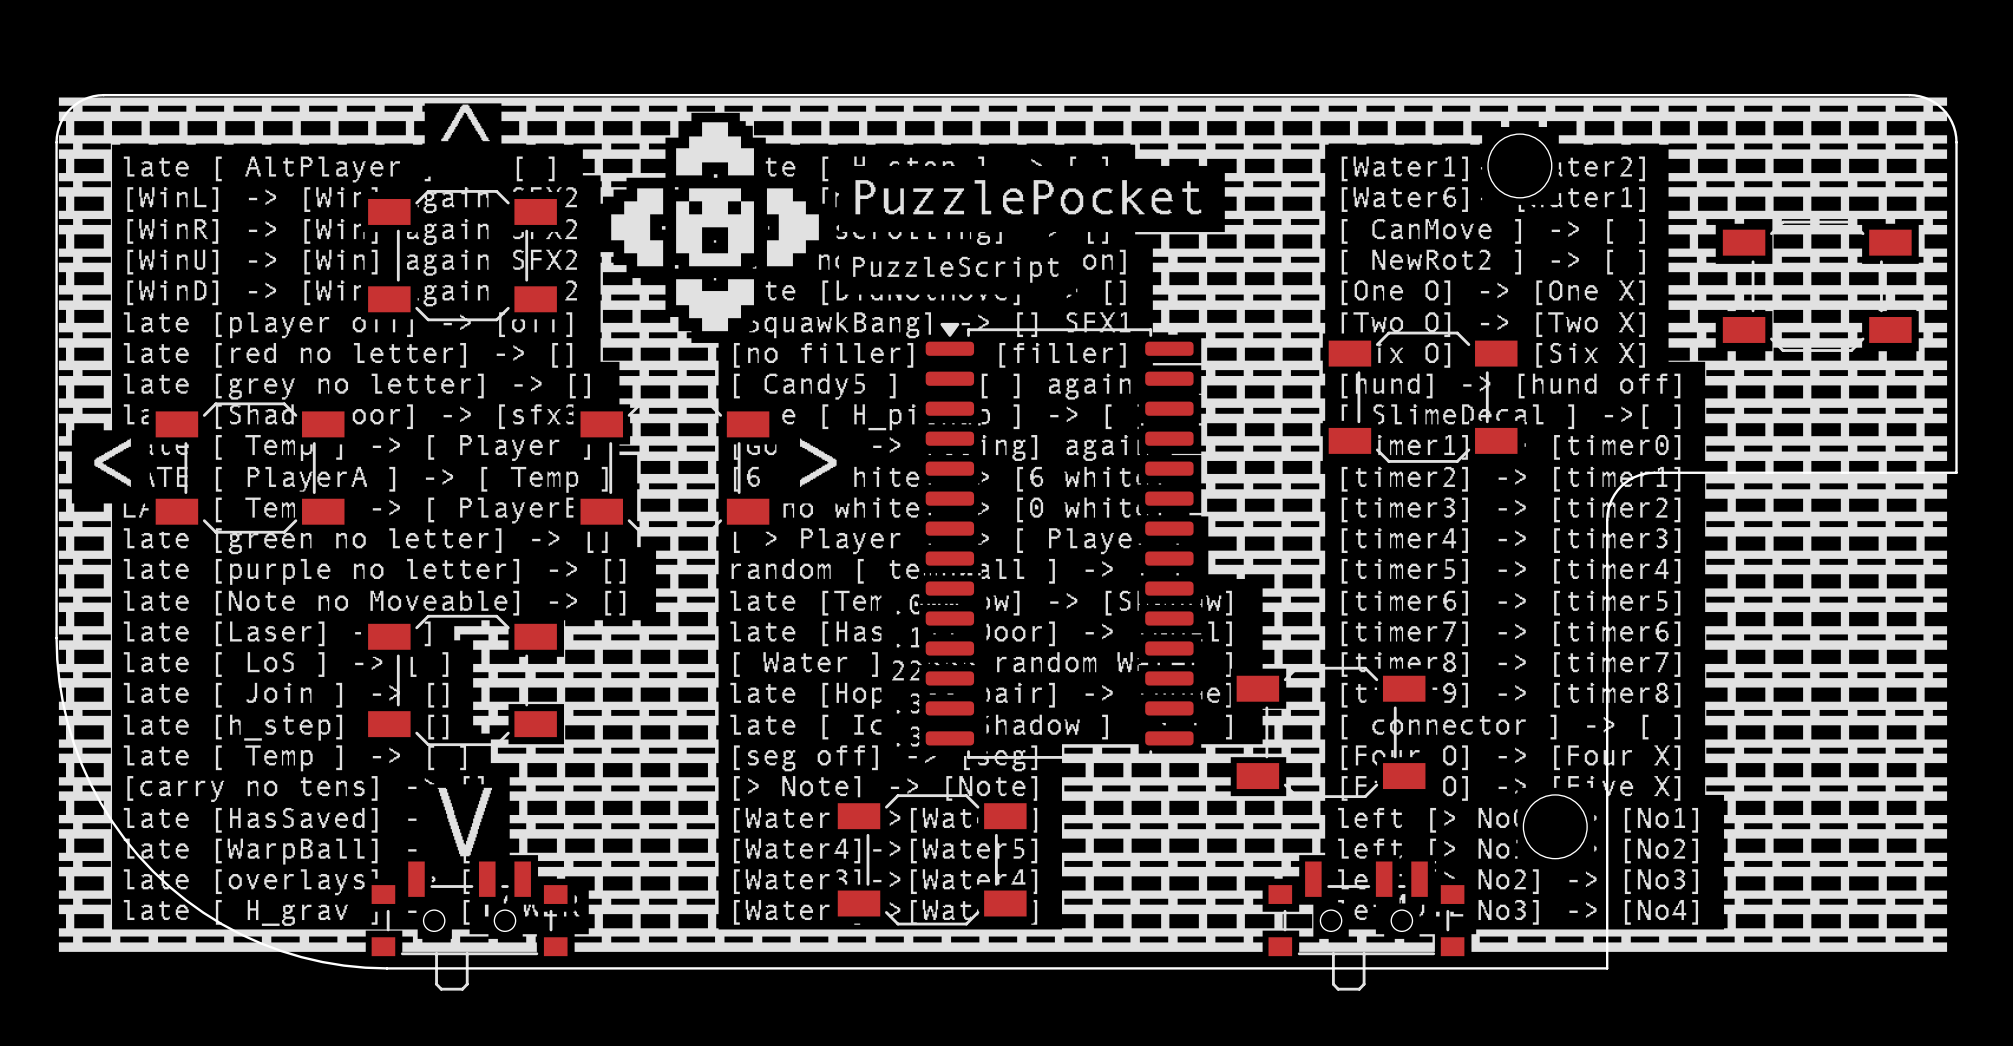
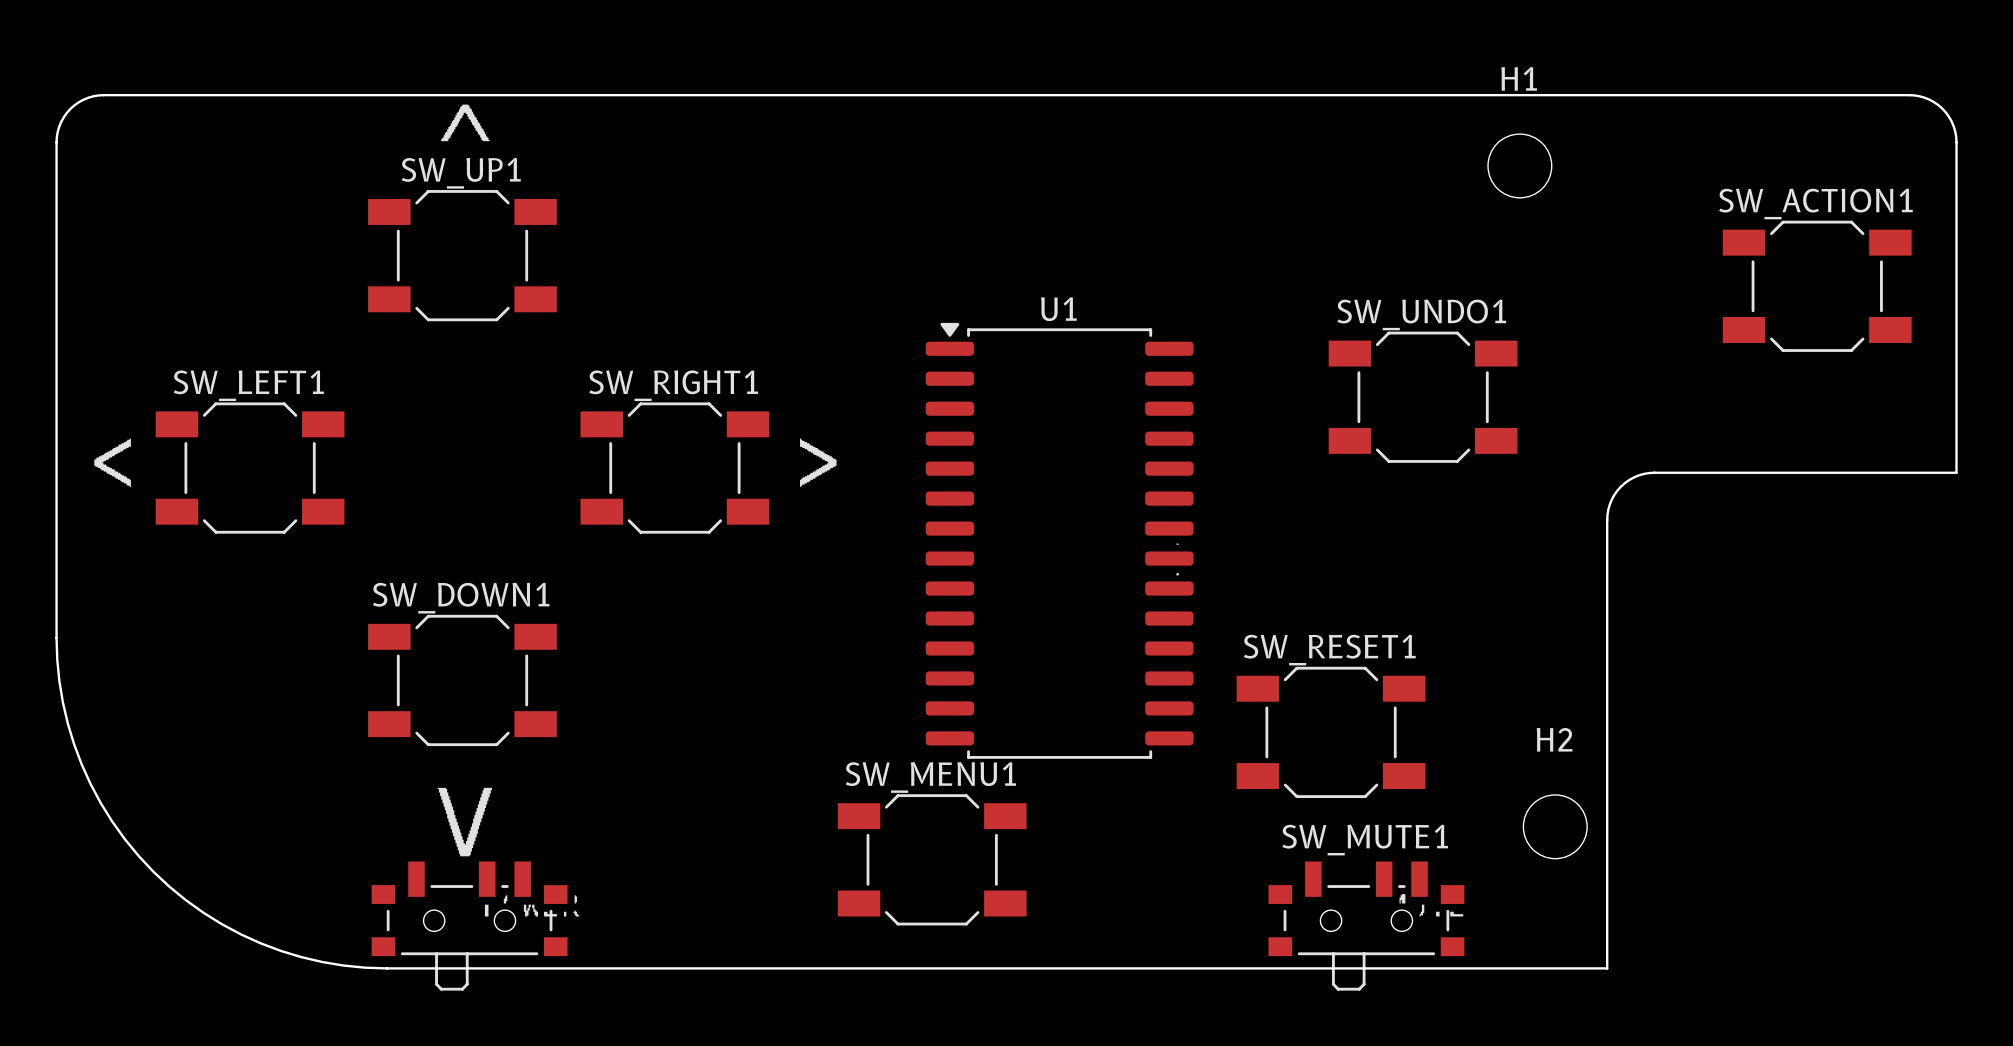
H1 name: none -> H1 (1519, 78)
drawing: [58, 97, 1948, 952] -> none
SW_UP1 name: none -> SW_UP1 (461, 173)
SW_ACTION1 name: none -> SW_ACTION1 (1815, 204)
U1 name: none -> U1 (1058, 309)
SW_UNDO1 name: none -> SW_UNDO1 (1421, 314)
SW_LEFT1 name: none -> SW_LEFT1 (248, 385)
SW_RIGHT1 name: none -> SW_RIGHT1 (673, 385)
SW_DOWN1 name: none -> SW_DOWN1 (461, 598)
SW_RESET1 name: none -> SW_RESET1 (1329, 650)
H2 name: none -> H2 (1554, 739)
SW_MENU1 name: none -> SW_MENU1 (930, 777)
drawing: [408, 818, 417, 821] -> none
SW_MUTE1 name: none -> SW_MUTE1 (1365, 840)
drawing: [408, 849, 417, 852] -> none

